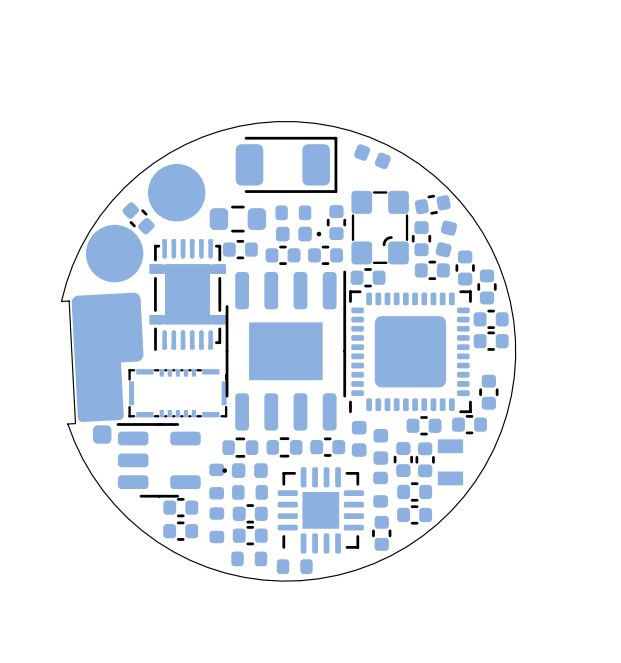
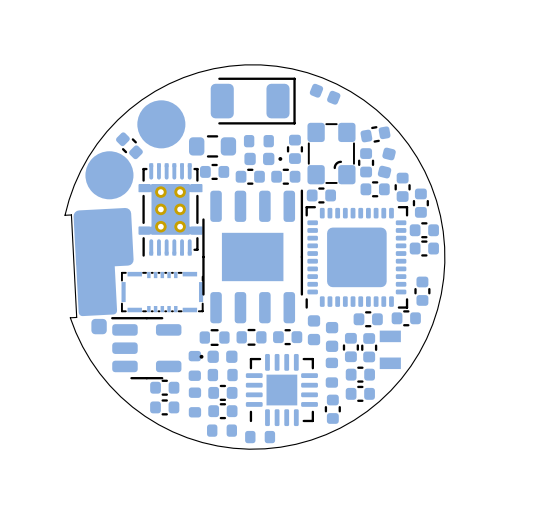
part footprint: [149, 239, 226, 351] -> [138, 163, 203, 257]

